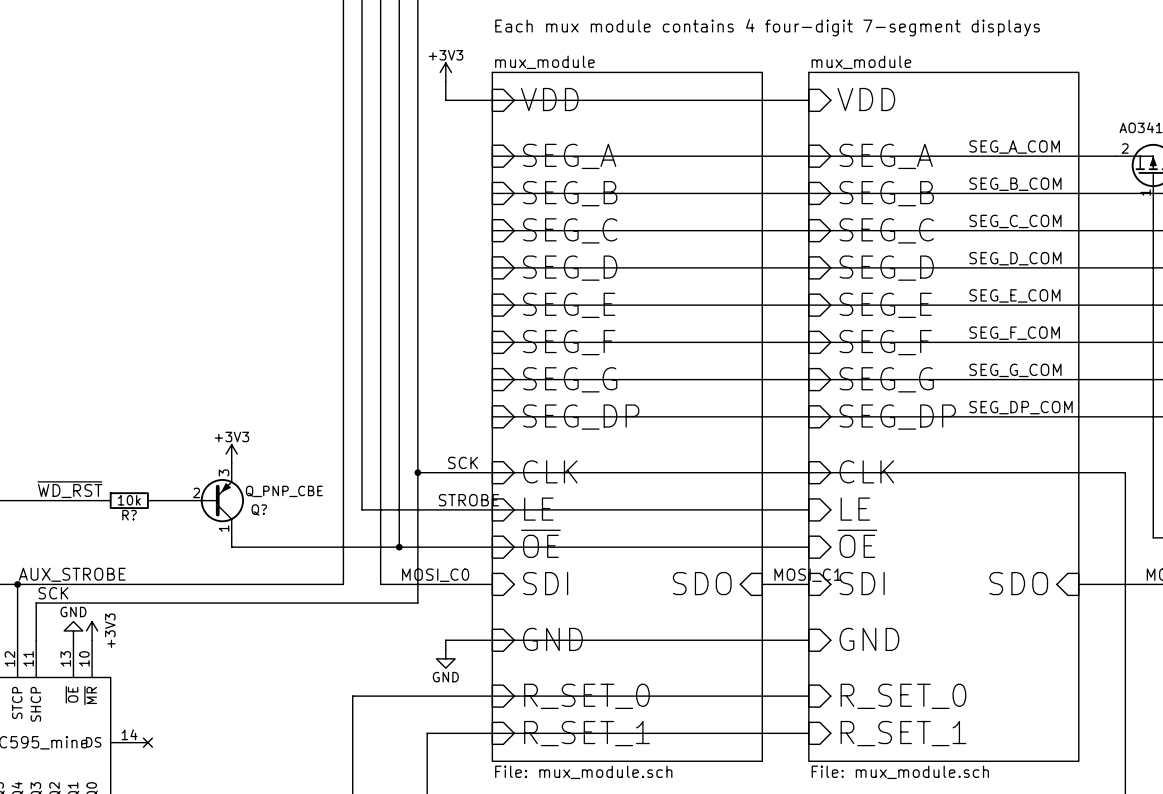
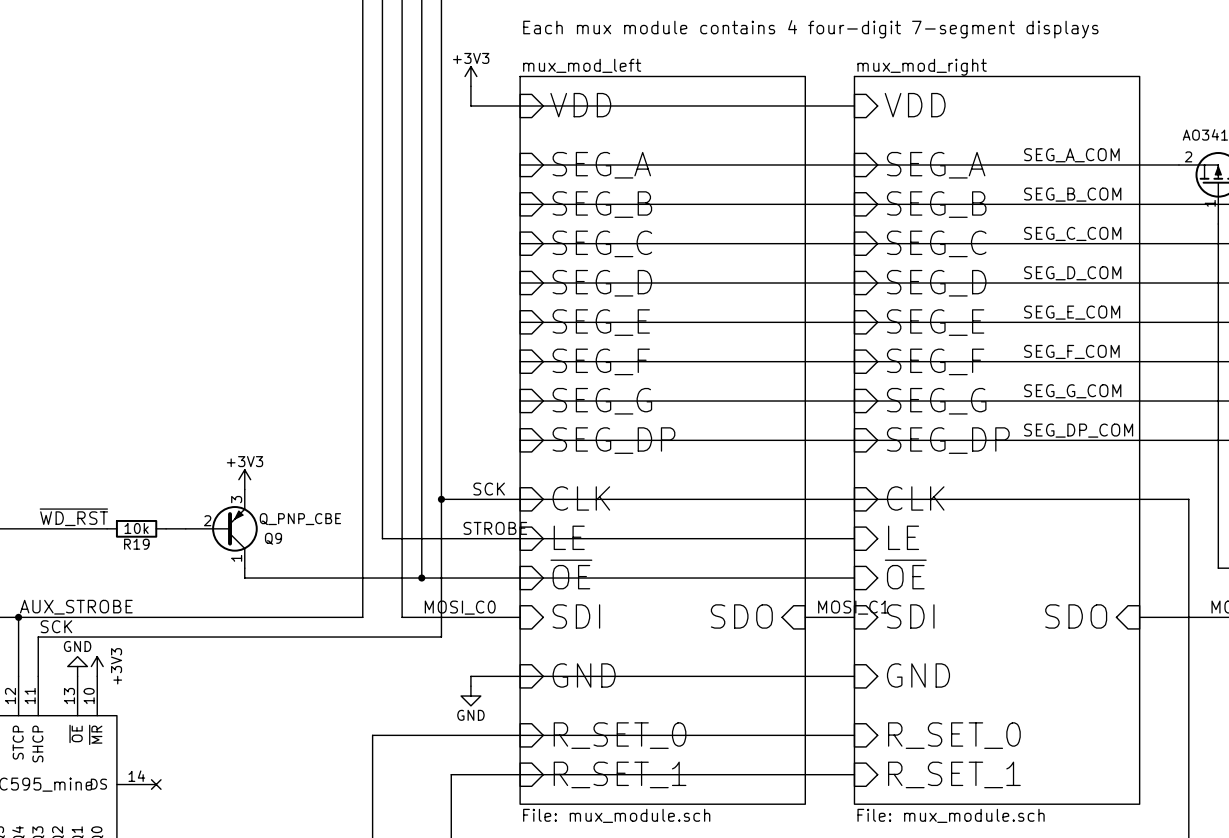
sheet mux_module name: mux_module (544, 62) -> mux_mod_left (582, 65)
sheet mux_module name: mux_module (861, 62) -> mux_mod_right (922, 67)
Q? name: Q? (259, 510) -> Q9 (273, 538)
R? name: R? (129, 515) -> R19 (136, 544)

